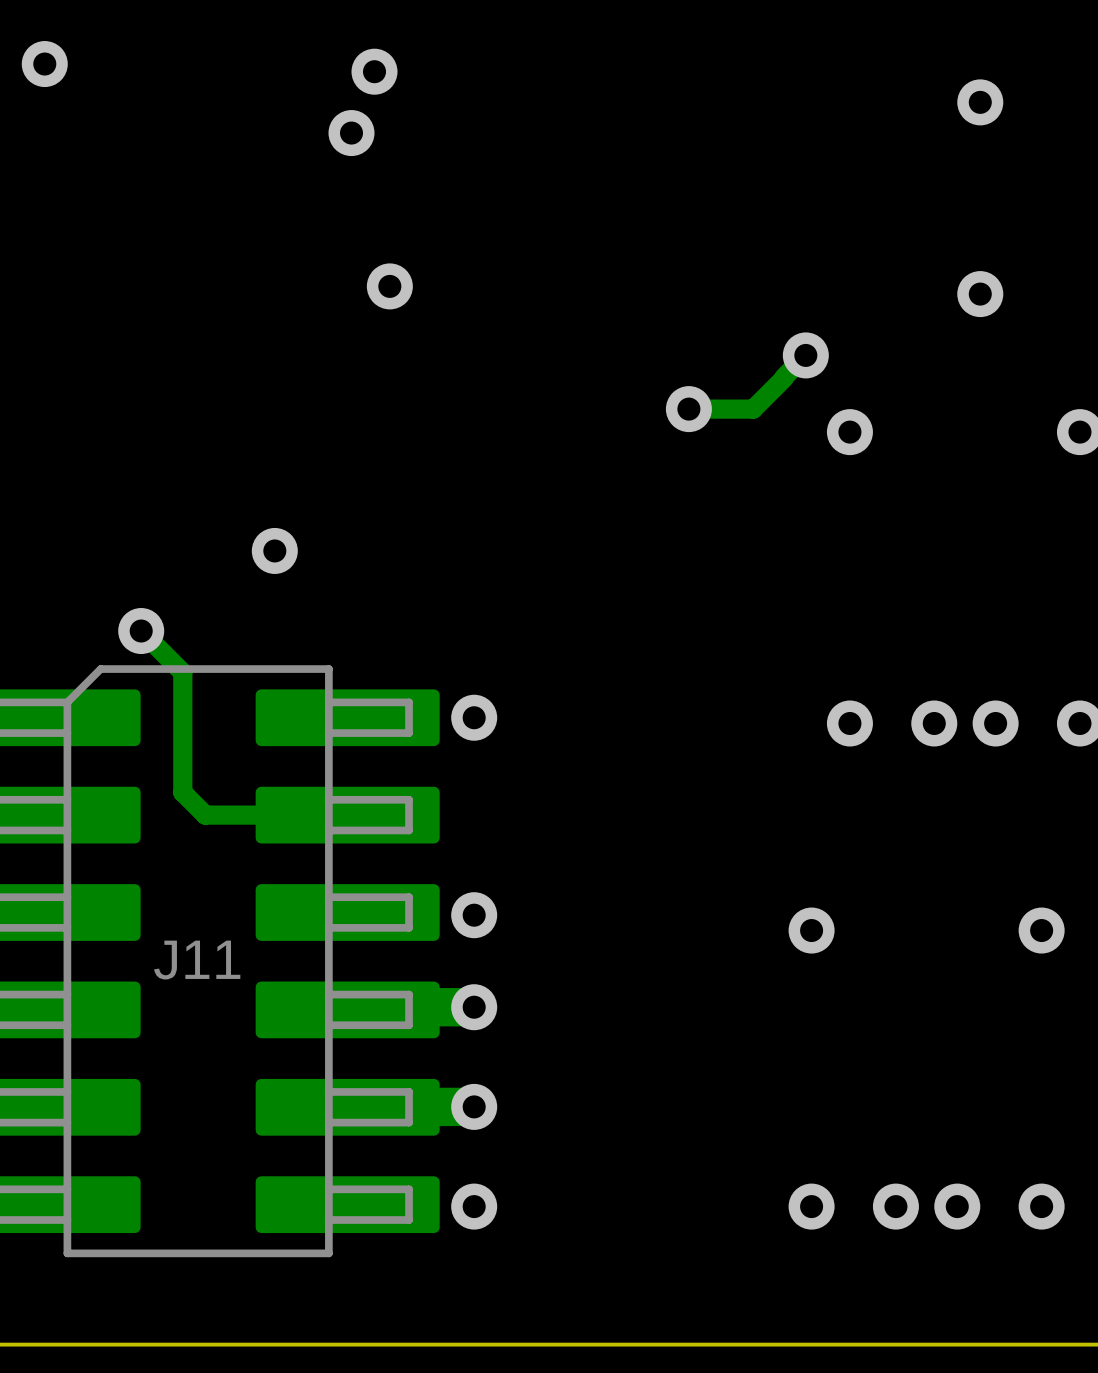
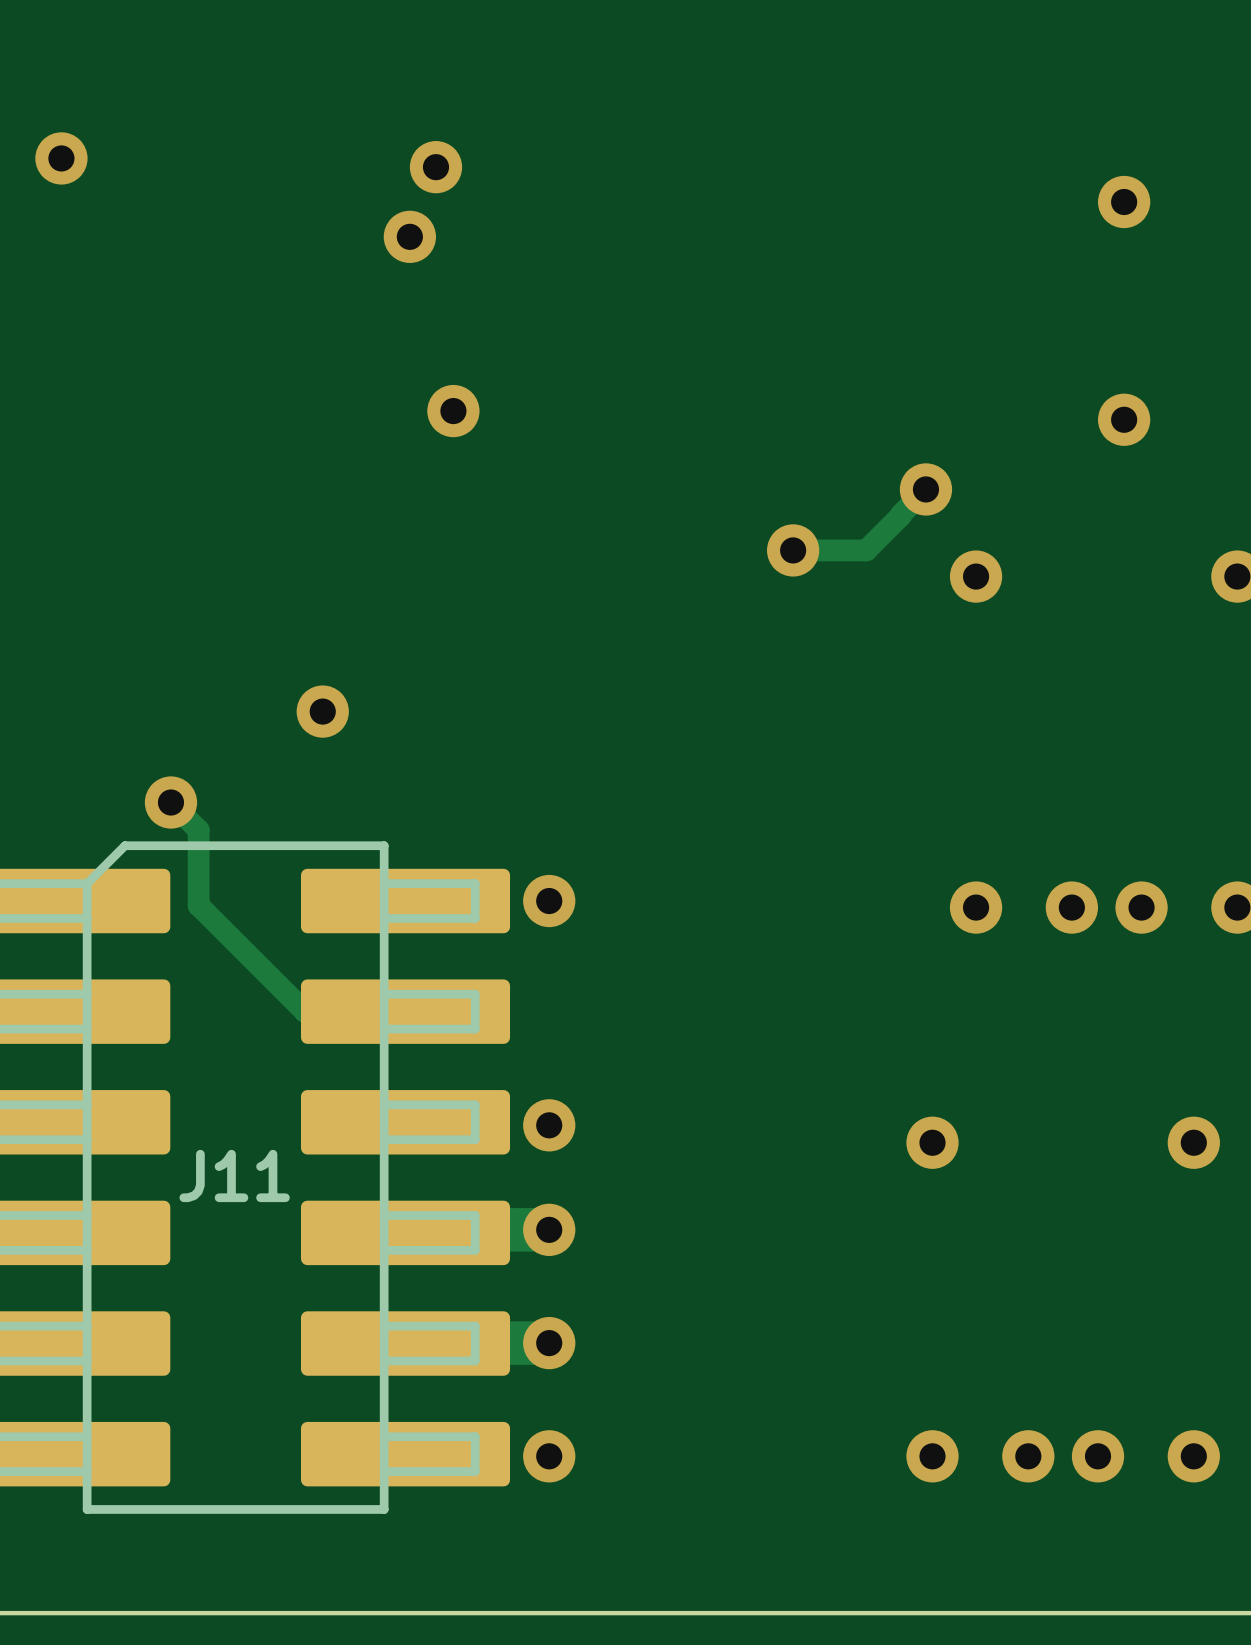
track: (165, 655) (182, 672) (182, 792) (205, 815) (259, 815) -> (198, 830) (198, 905) (304, 1011)

